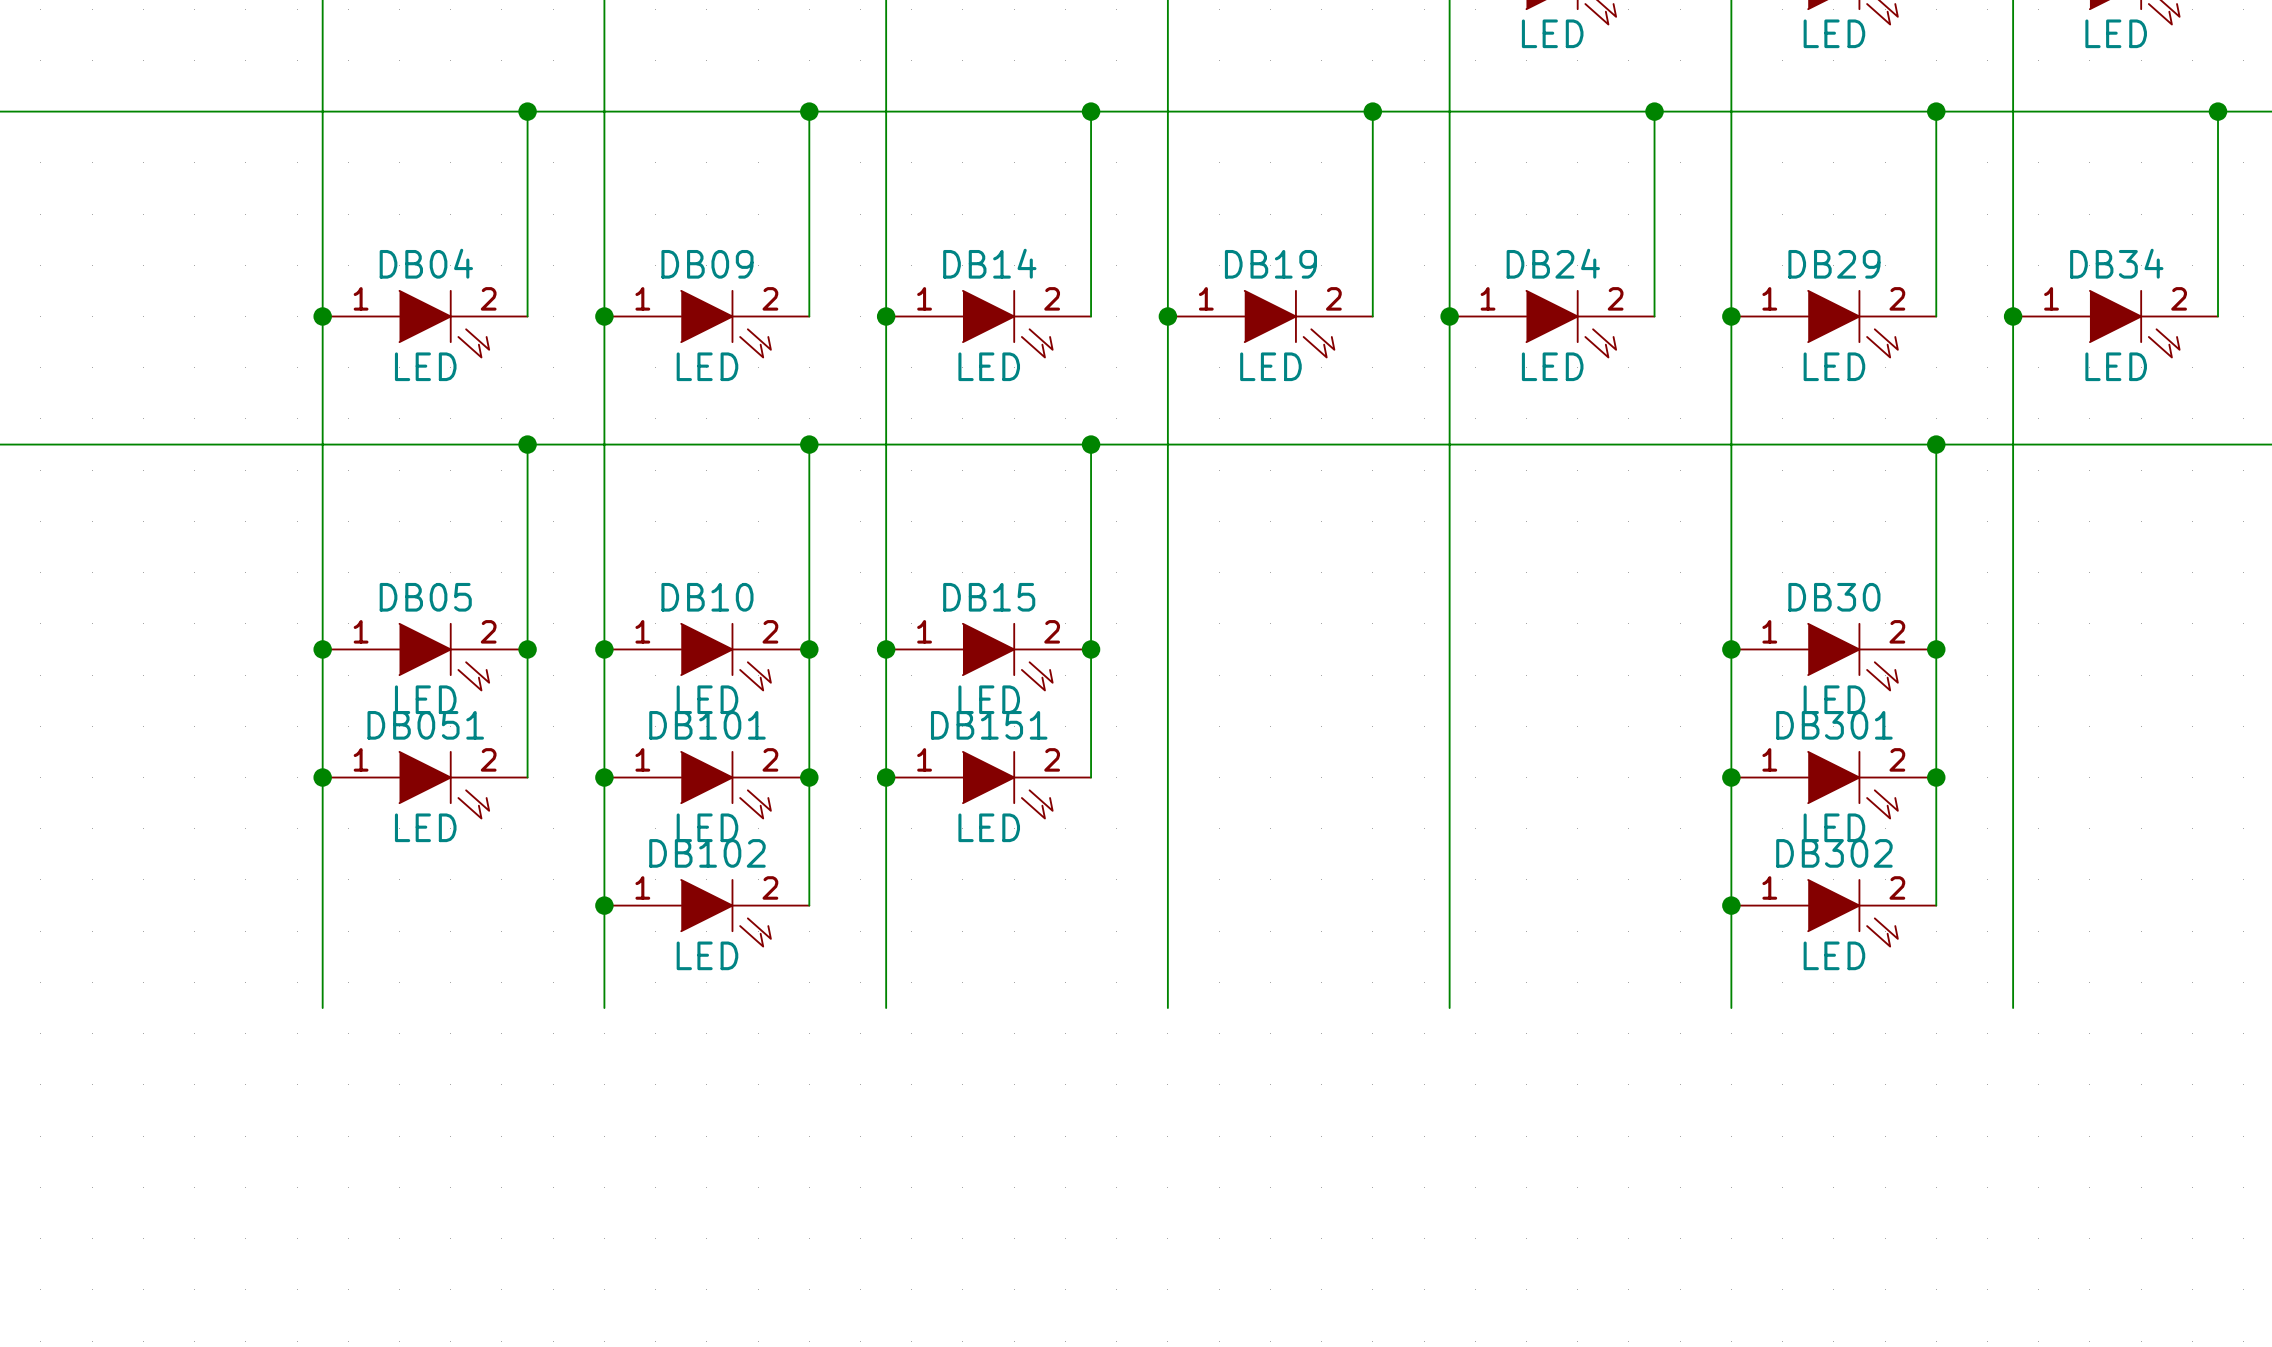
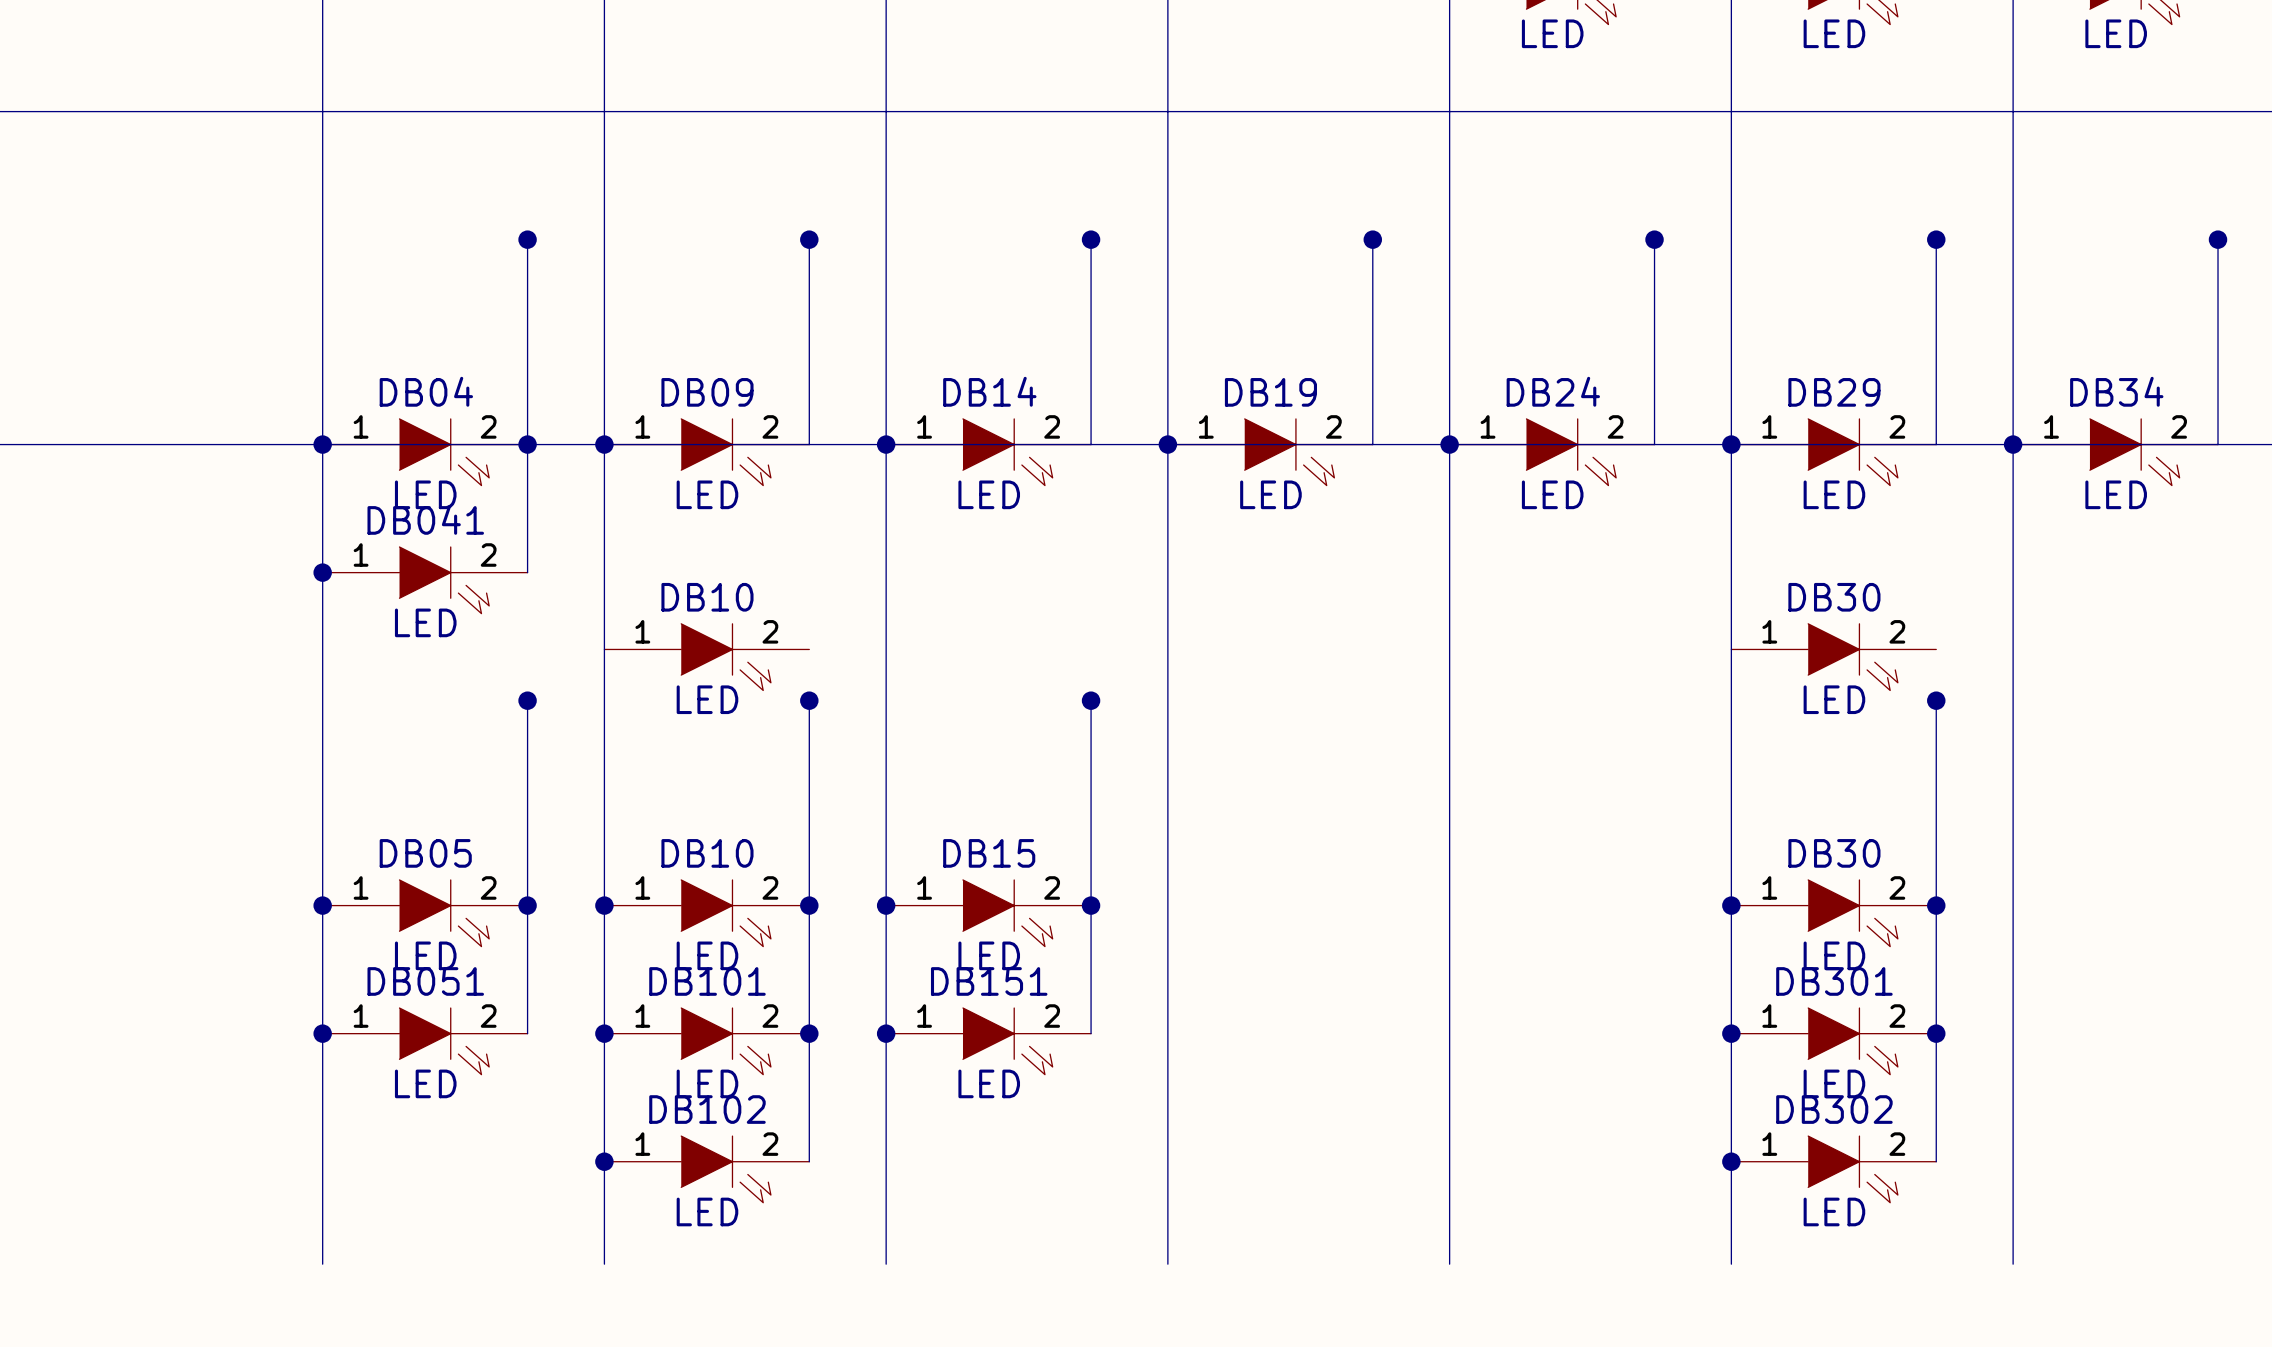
wire: (527, 111) (527, 239) -> (527, 316) (527, 444)
junction: (527, 111) -> none
wire: (809, 111) (809, 239) -> none
junction: (809, 111) -> none
wire: (1091, 111) (1091, 239) -> none
junction: (1091, 111) -> none
wire: (1372, 111) (1372, 239) -> (1372, 316) (1372, 444)
junction: (1372, 111) -> none
wire: (1654, 111) (1654, 239) -> (1654, 316) (1654, 444)
junction: (1654, 111) -> none
wire: (1936, 111) (1936, 239) -> none
junction: (1936, 111) -> none
wire: (2218, 111) (2218, 239) -> (2218, 316) (2218, 444)
junction: (2218, 111) -> none
junction: none -> (527, 239)
junction: none -> (809, 239)
junction: none -> (1091, 239)
junction: none -> (1372, 239)
junction: none -> (1654, 239)
junction: none -> (1936, 239)
junction: none -> (2218, 239)
junction: (322, 316) -> none
junction: (604, 316) -> none
junction: (886, 316) -> none
junction: (1167, 316) -> none
junction: (1449, 316) -> none
junction: (1731, 316) -> none
junction: (2013, 316) -> none
DB04 position: (425, 324) -> (425, 452)
DB09 position: (706, 324) -> (706, 452)
DB14 position: (988, 324) -> (988, 452)
DB19 position: (1270, 324) -> (1270, 452)
DB24 position: (1552, 324) -> (1552, 452)
DB29 position: (1833, 324) -> (1833, 452)
DB34 position: (2115, 324) -> (2115, 452)
junction: none -> (322, 444)
junction: none -> (604, 444)
wire: (809, 444) (809, 700) -> (809, 444) (809, 316)
junction: (809, 444) -> none
junction: none -> (886, 444)
wire: (1091, 444) (1091, 700) -> (1091, 444) (1091, 316)
junction: (1091, 444) -> none
junction: none -> (1167, 444)
junction: none -> (1449, 444)
junction: none -> (1731, 444)
wire: (1936, 444) (1936, 700) -> (1936, 444) (1936, 316)
junction: (1936, 444) -> none
junction: none -> (2013, 444)
wire: (527, 572) (527, 700) -> none
DB041: none -> LED (425, 580)
junction position: (322, 649) -> (322, 572)
junction: (527, 649) -> none
junction: (604, 649) -> none
junction: (809, 649) -> none
junction: (886, 649) -> none
junction position: (1091, 649) -> (1091, 700)
junction: (1731, 649) -> none
junction: (1936, 649) -> none
DB05 position: (425, 657) -> (425, 913)
DB15 position: (988, 657) -> (988, 913)
junction: none -> (527, 700)
junction: none -> (809, 700)
junction: none -> (1936, 700)
junction: (322, 777) -> none
wire: none -> (527, 777) (527, 1033)
junction: (604, 777) -> none
junction: (809, 777) -> none
junction: (886, 777) -> none
wire: none -> (1091, 777) (1091, 1033)
junction: (1731, 777) -> none
junction: (1936, 777) -> none
DB051 position: (425, 785) -> (425, 1041)
DB101 position: (706, 785) -> (706, 1041)
DB151 position: (988, 785) -> (988, 1041)
DB301 position: (1833, 785) -> (1833, 1041)
DB102 name: DB102 (707, 853) -> DB10 (707, 853)
DB302 name: DB302 (1834, 853) -> DB30 (1834, 853)
junction: none -> (322, 905)
junction: none -> (527, 905)
wire: none -> (809, 905) (809, 1161)
junction: none -> (809, 905)
junction: none -> (886, 905)
junction: none -> (1091, 905)
wire: none -> (1936, 905) (1936, 1161)
junction: none -> (1936, 905)
wire: none -> (322, 1008) (322, 1264)
wire: none -> (604, 1008) (604, 1264)
wire: none -> (886, 1008) (886, 1264)
wire: none -> (1167, 1008) (1167, 1264)
wire: none -> (1449, 1008) (1449, 1264)
wire: none -> (1731, 1008) (1731, 1264)
wire: none -> (2013, 1008) (2013, 1264)
junction: none -> (322, 1033)
junction: none -> (604, 1033)
junction: none -> (809, 1033)
junction: none -> (886, 1033)
junction: none -> (1731, 1033)
junction: none -> (1936, 1033)
junction: none -> (604, 1161)
junction: none -> (1731, 1161)
DB102: none -> LED (706, 1169)
DB302: none -> LED (1833, 1169)

